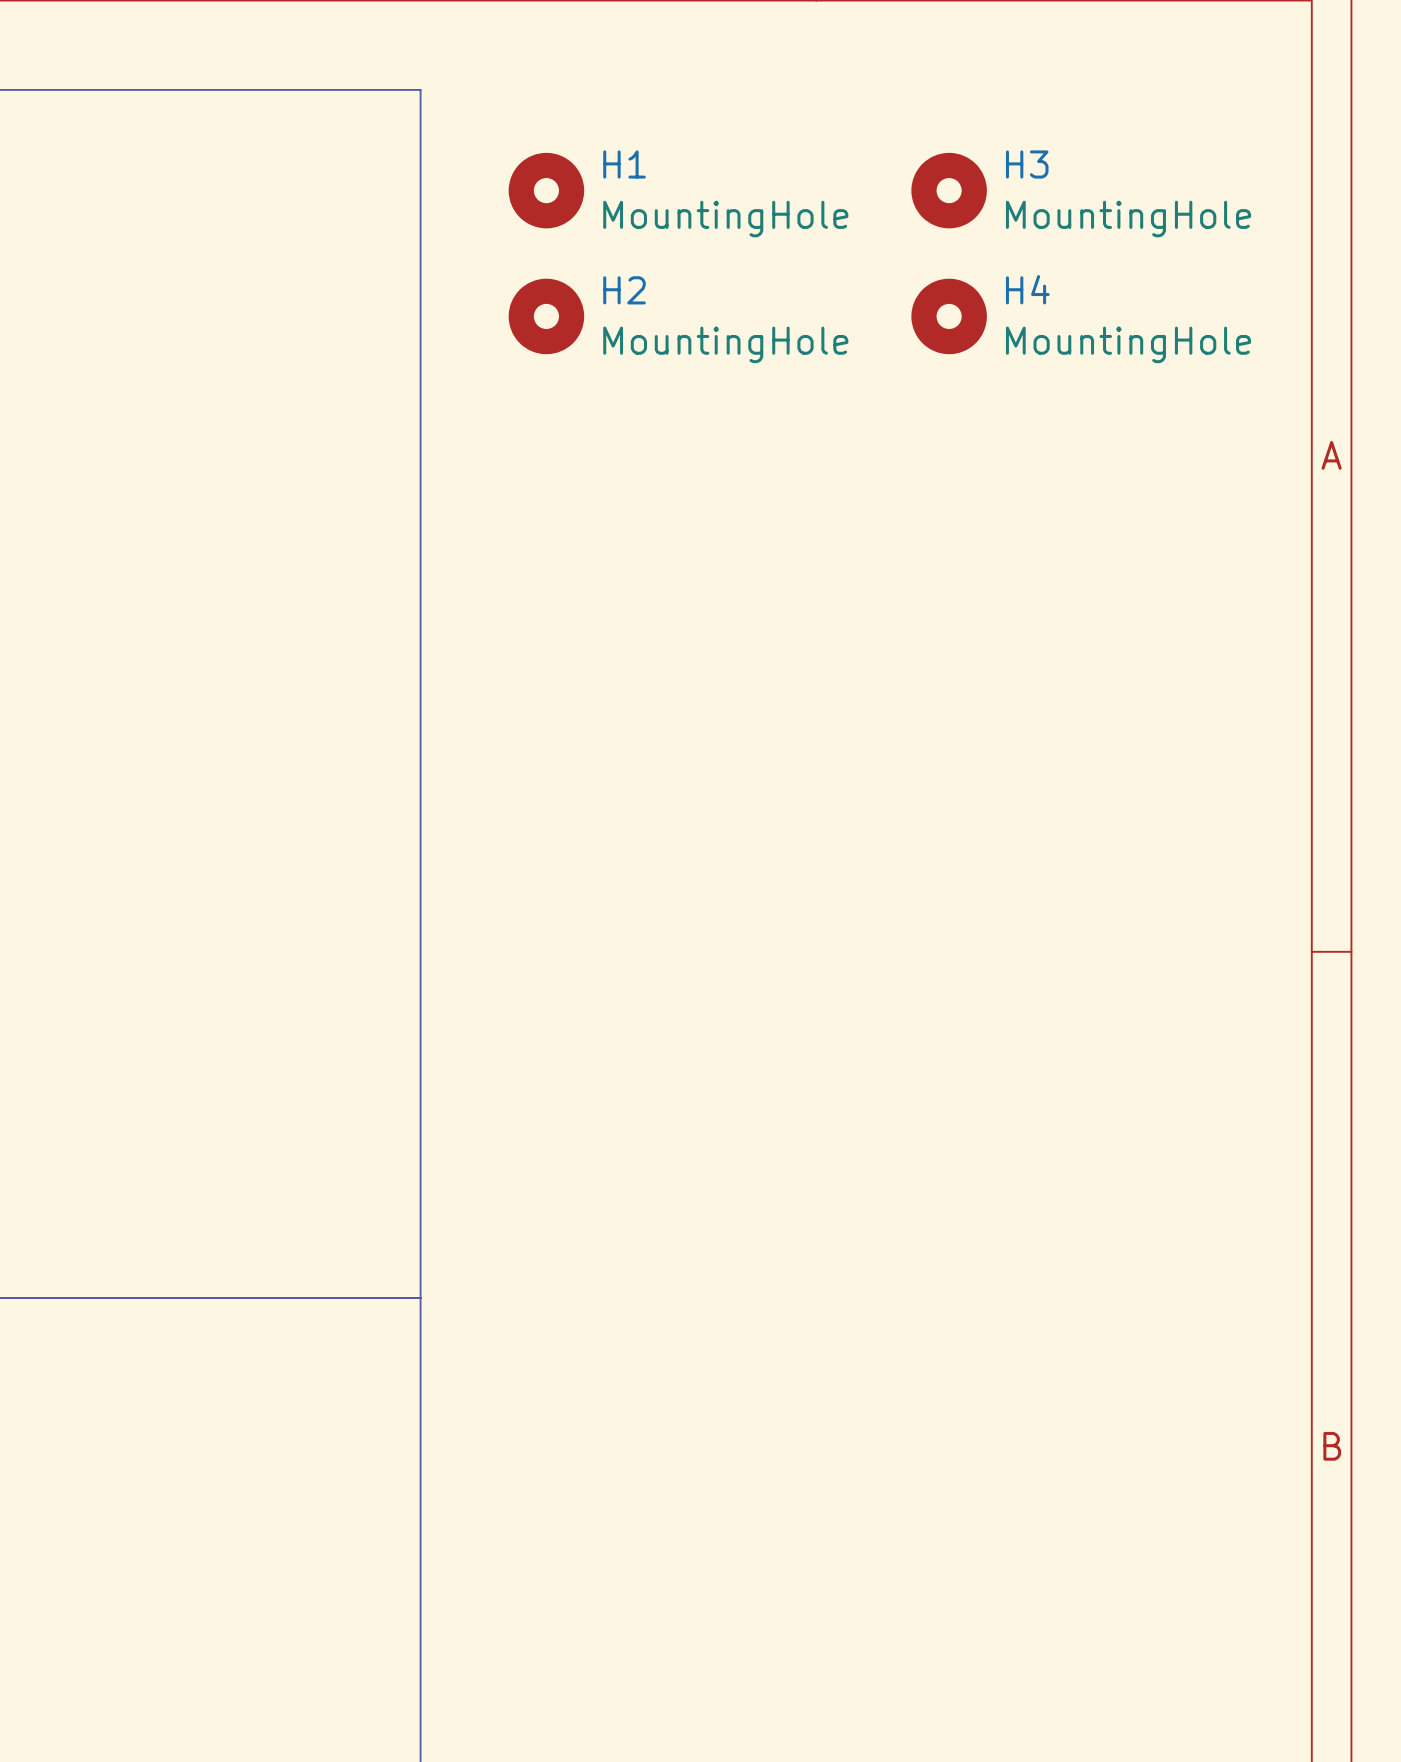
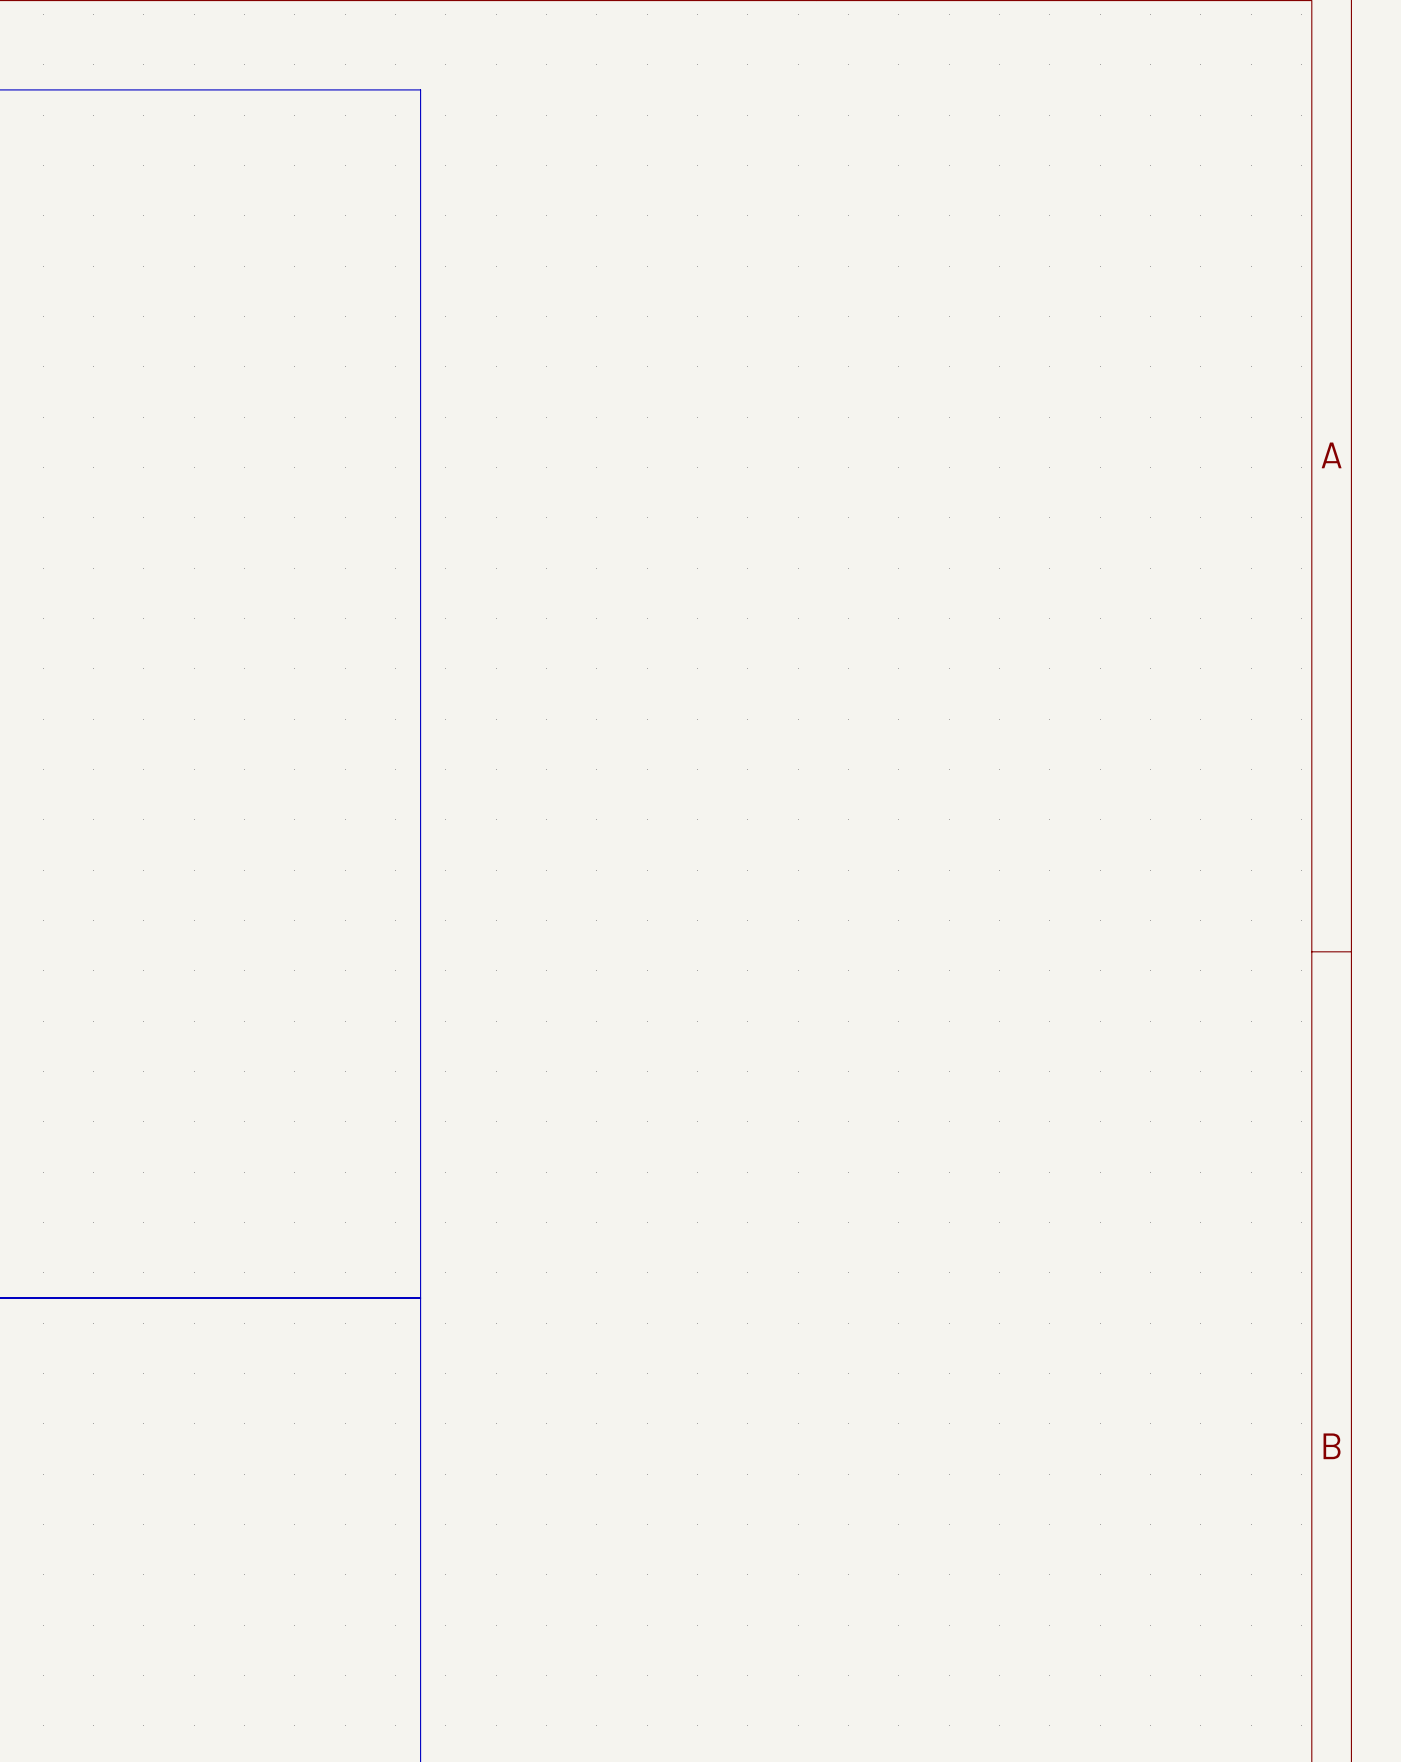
H1: MountingHole (546, 190) -> none
H3: MountingHole (949, 190) -> none
H2: MountingHole (546, 316) -> none
H4: MountingHole (949, 316) -> none

